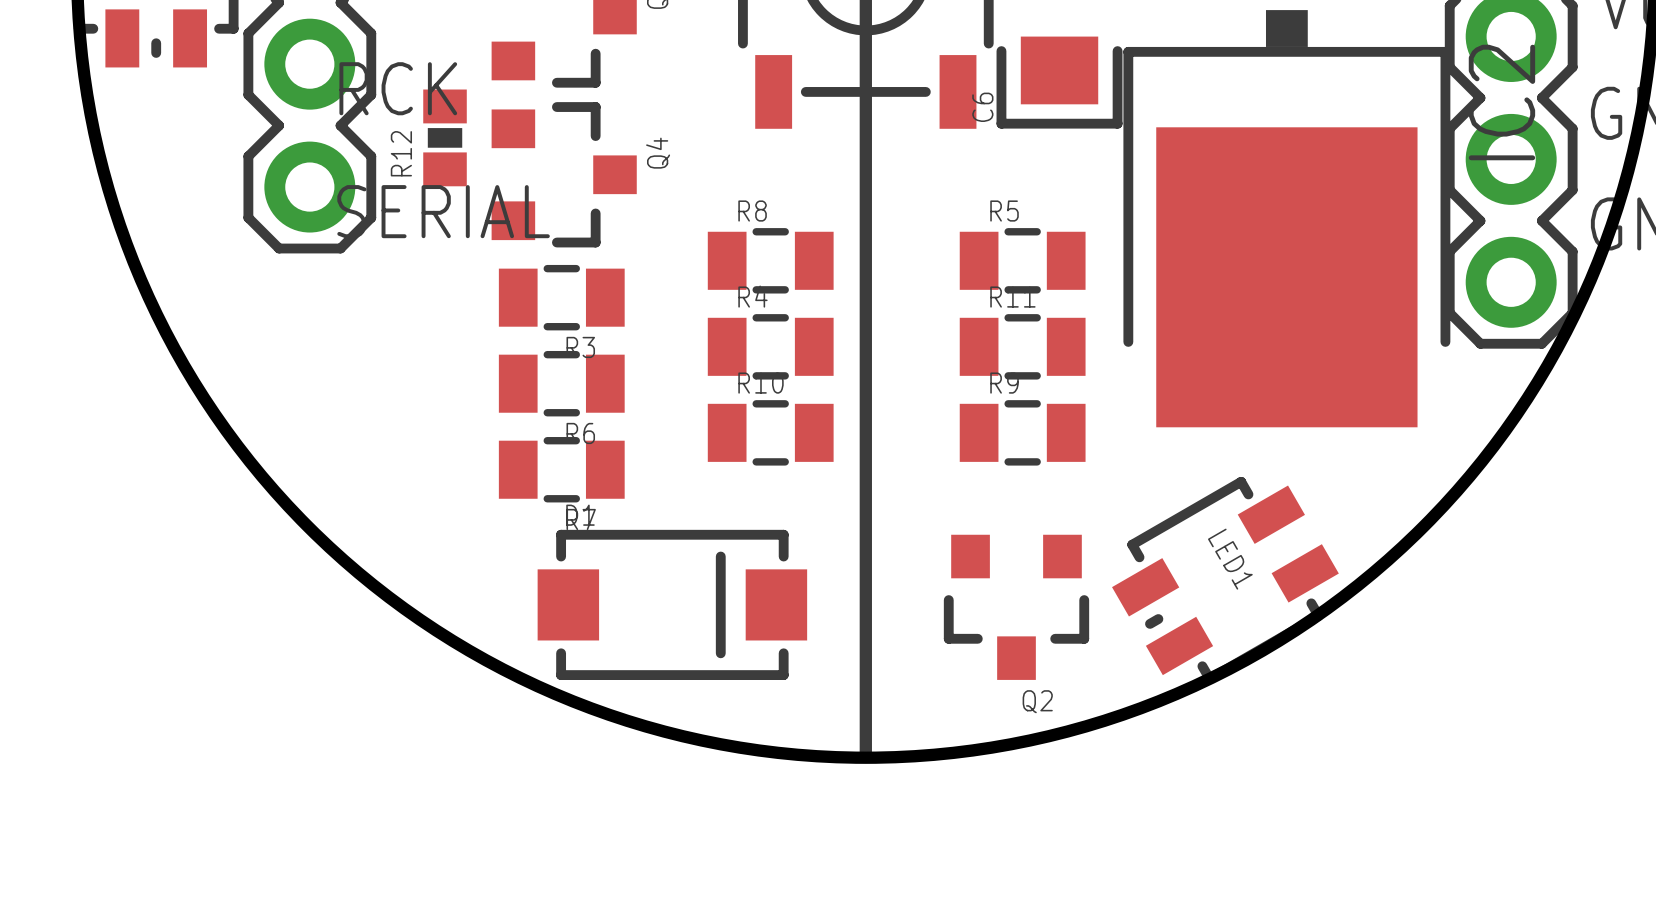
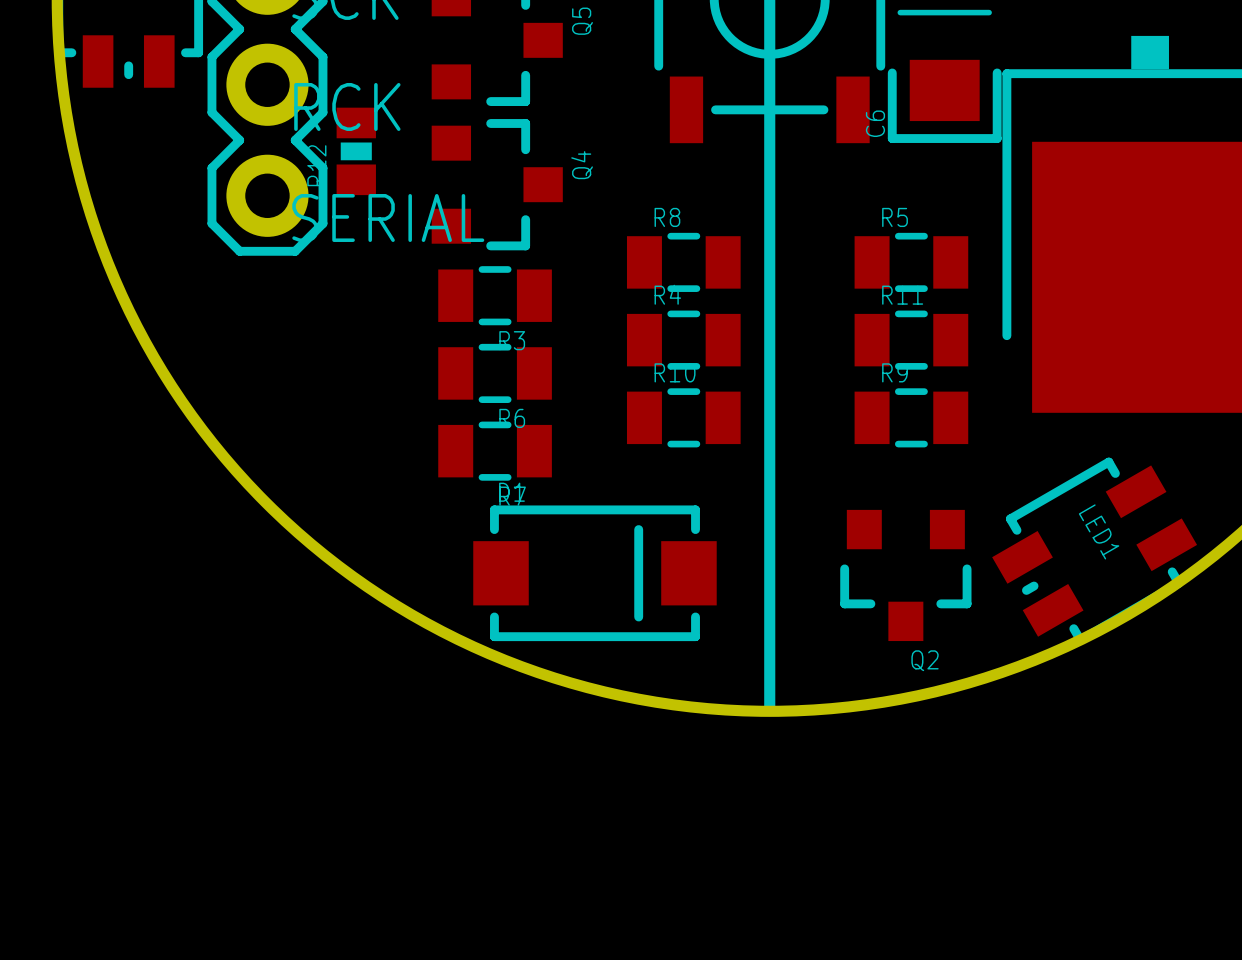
R12 position: (445, 137) -> (356, 151)

